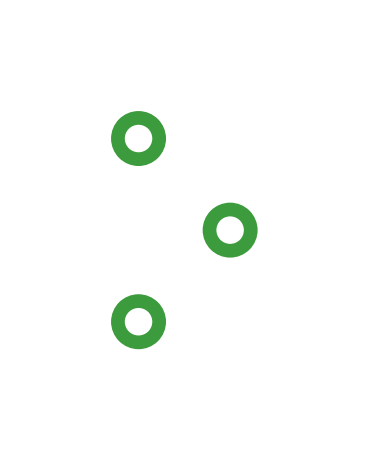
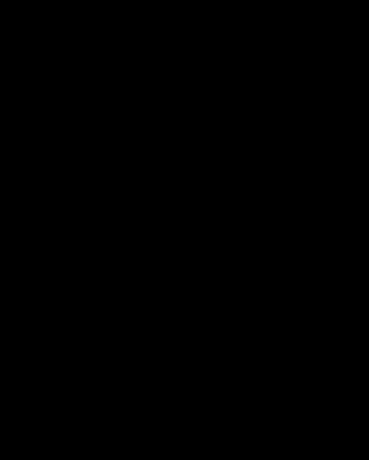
part: (184, 230) -> none

